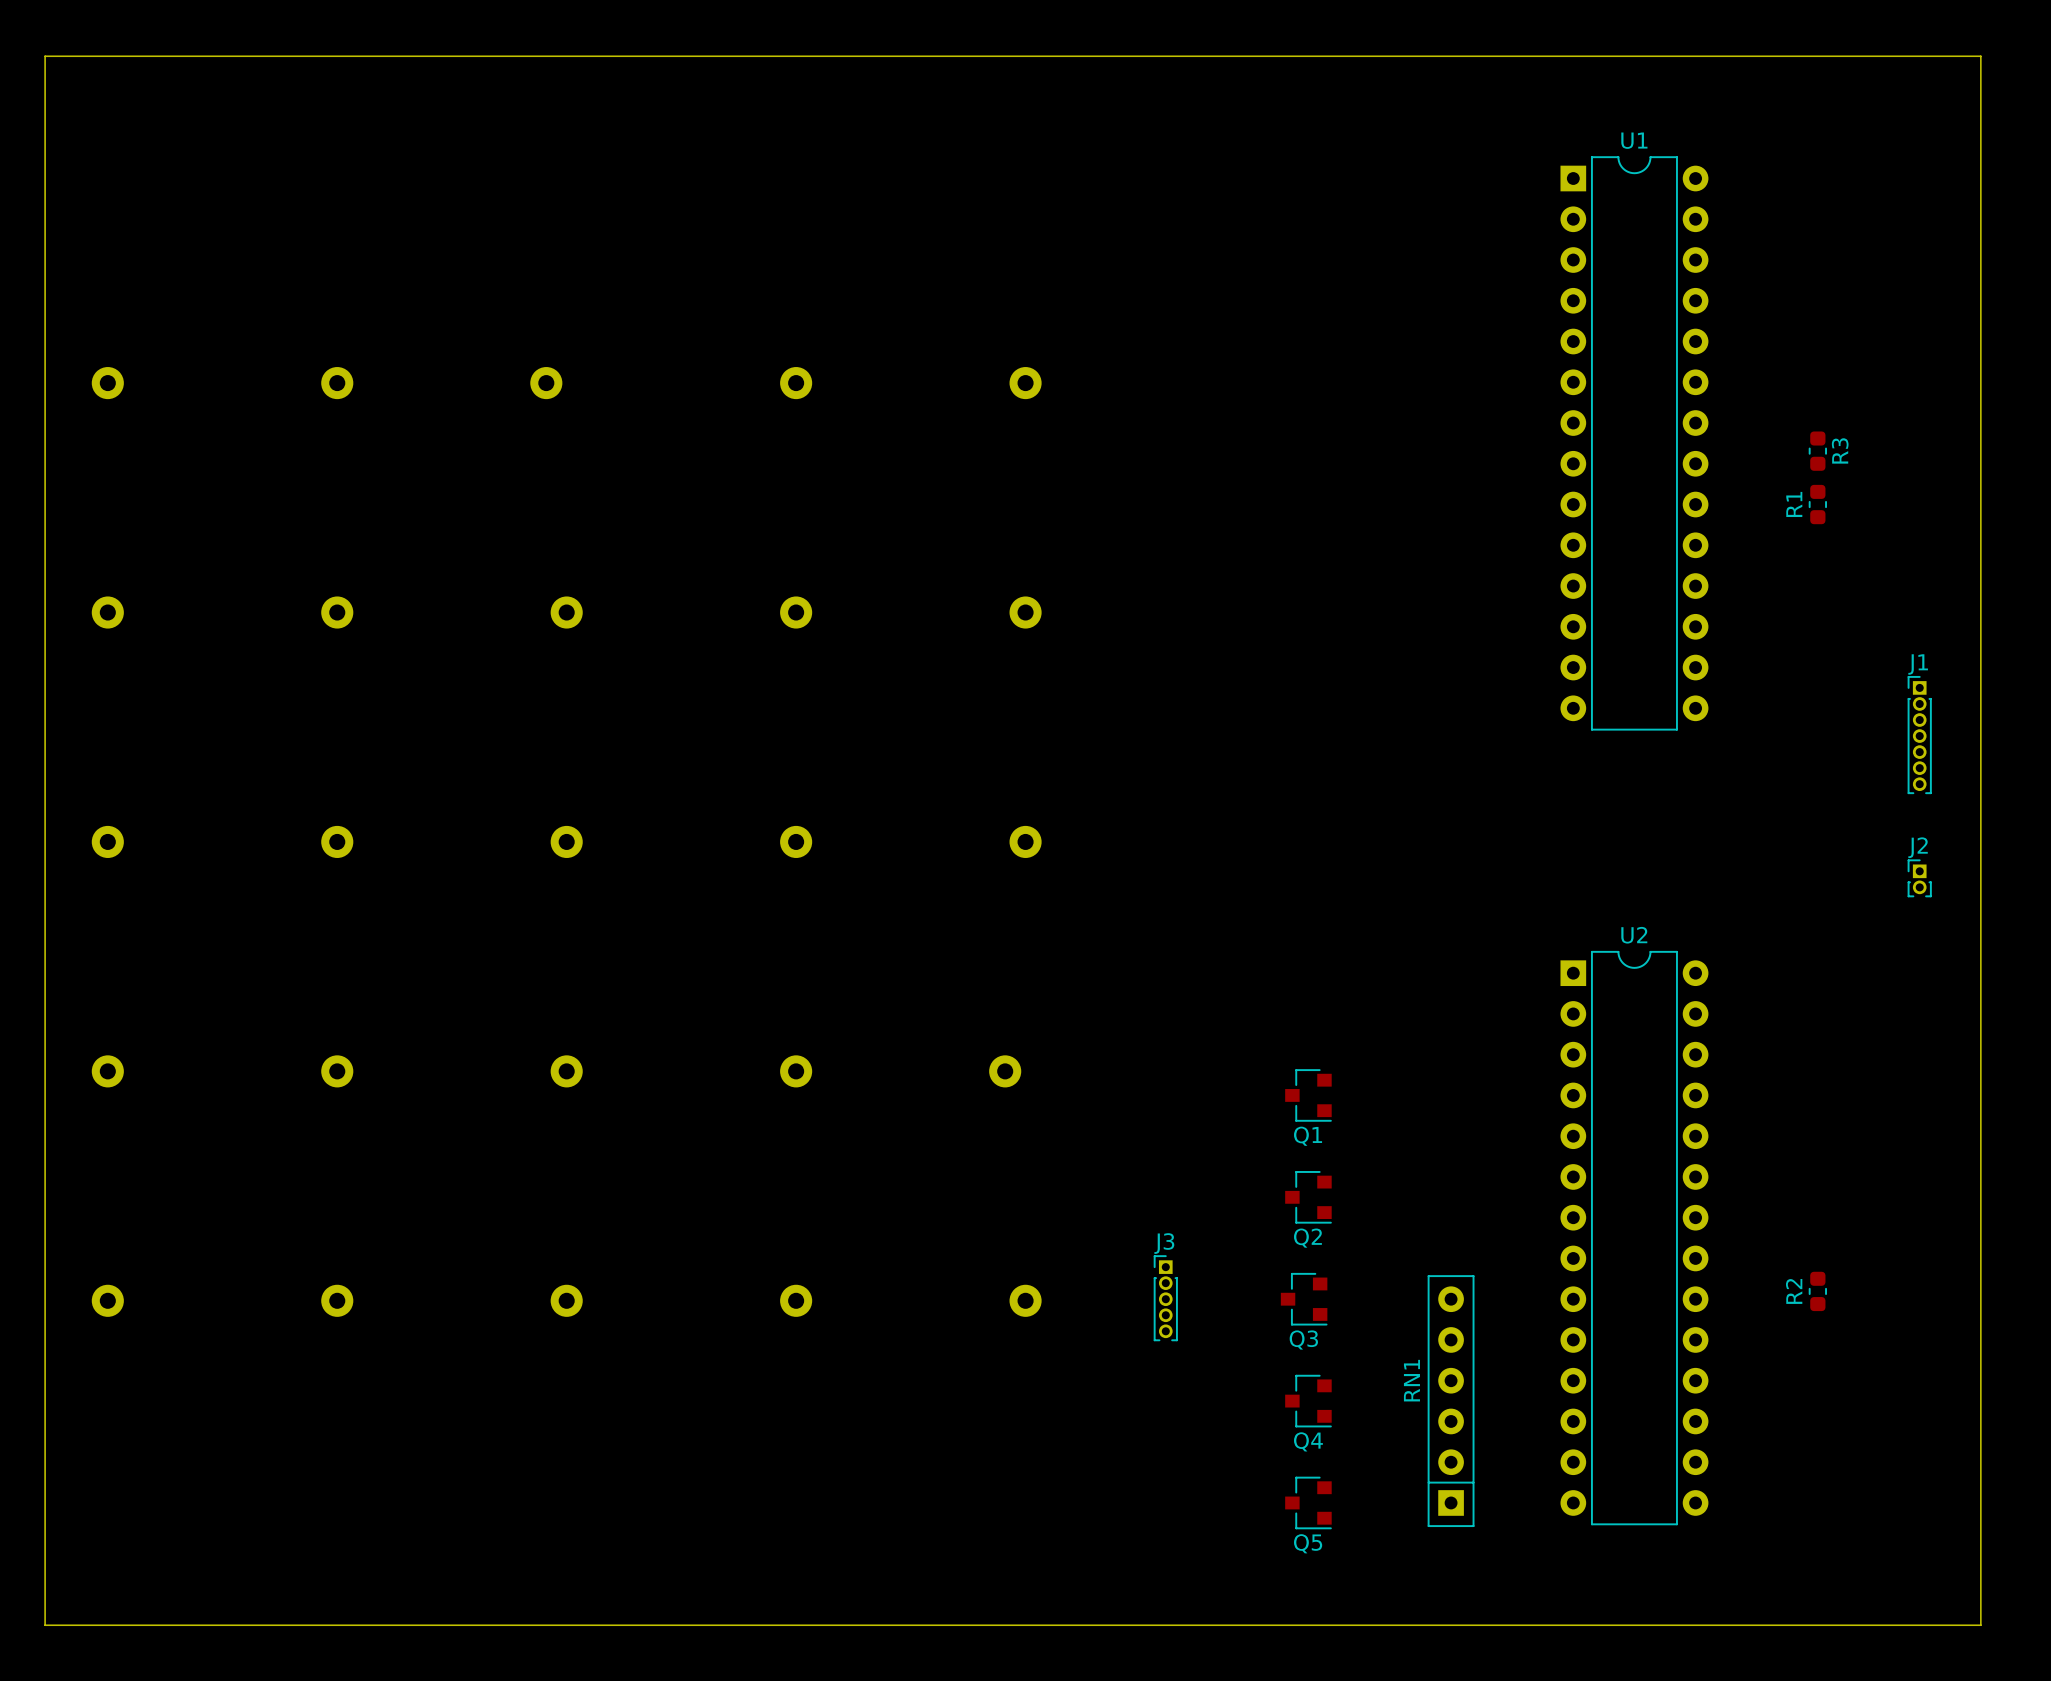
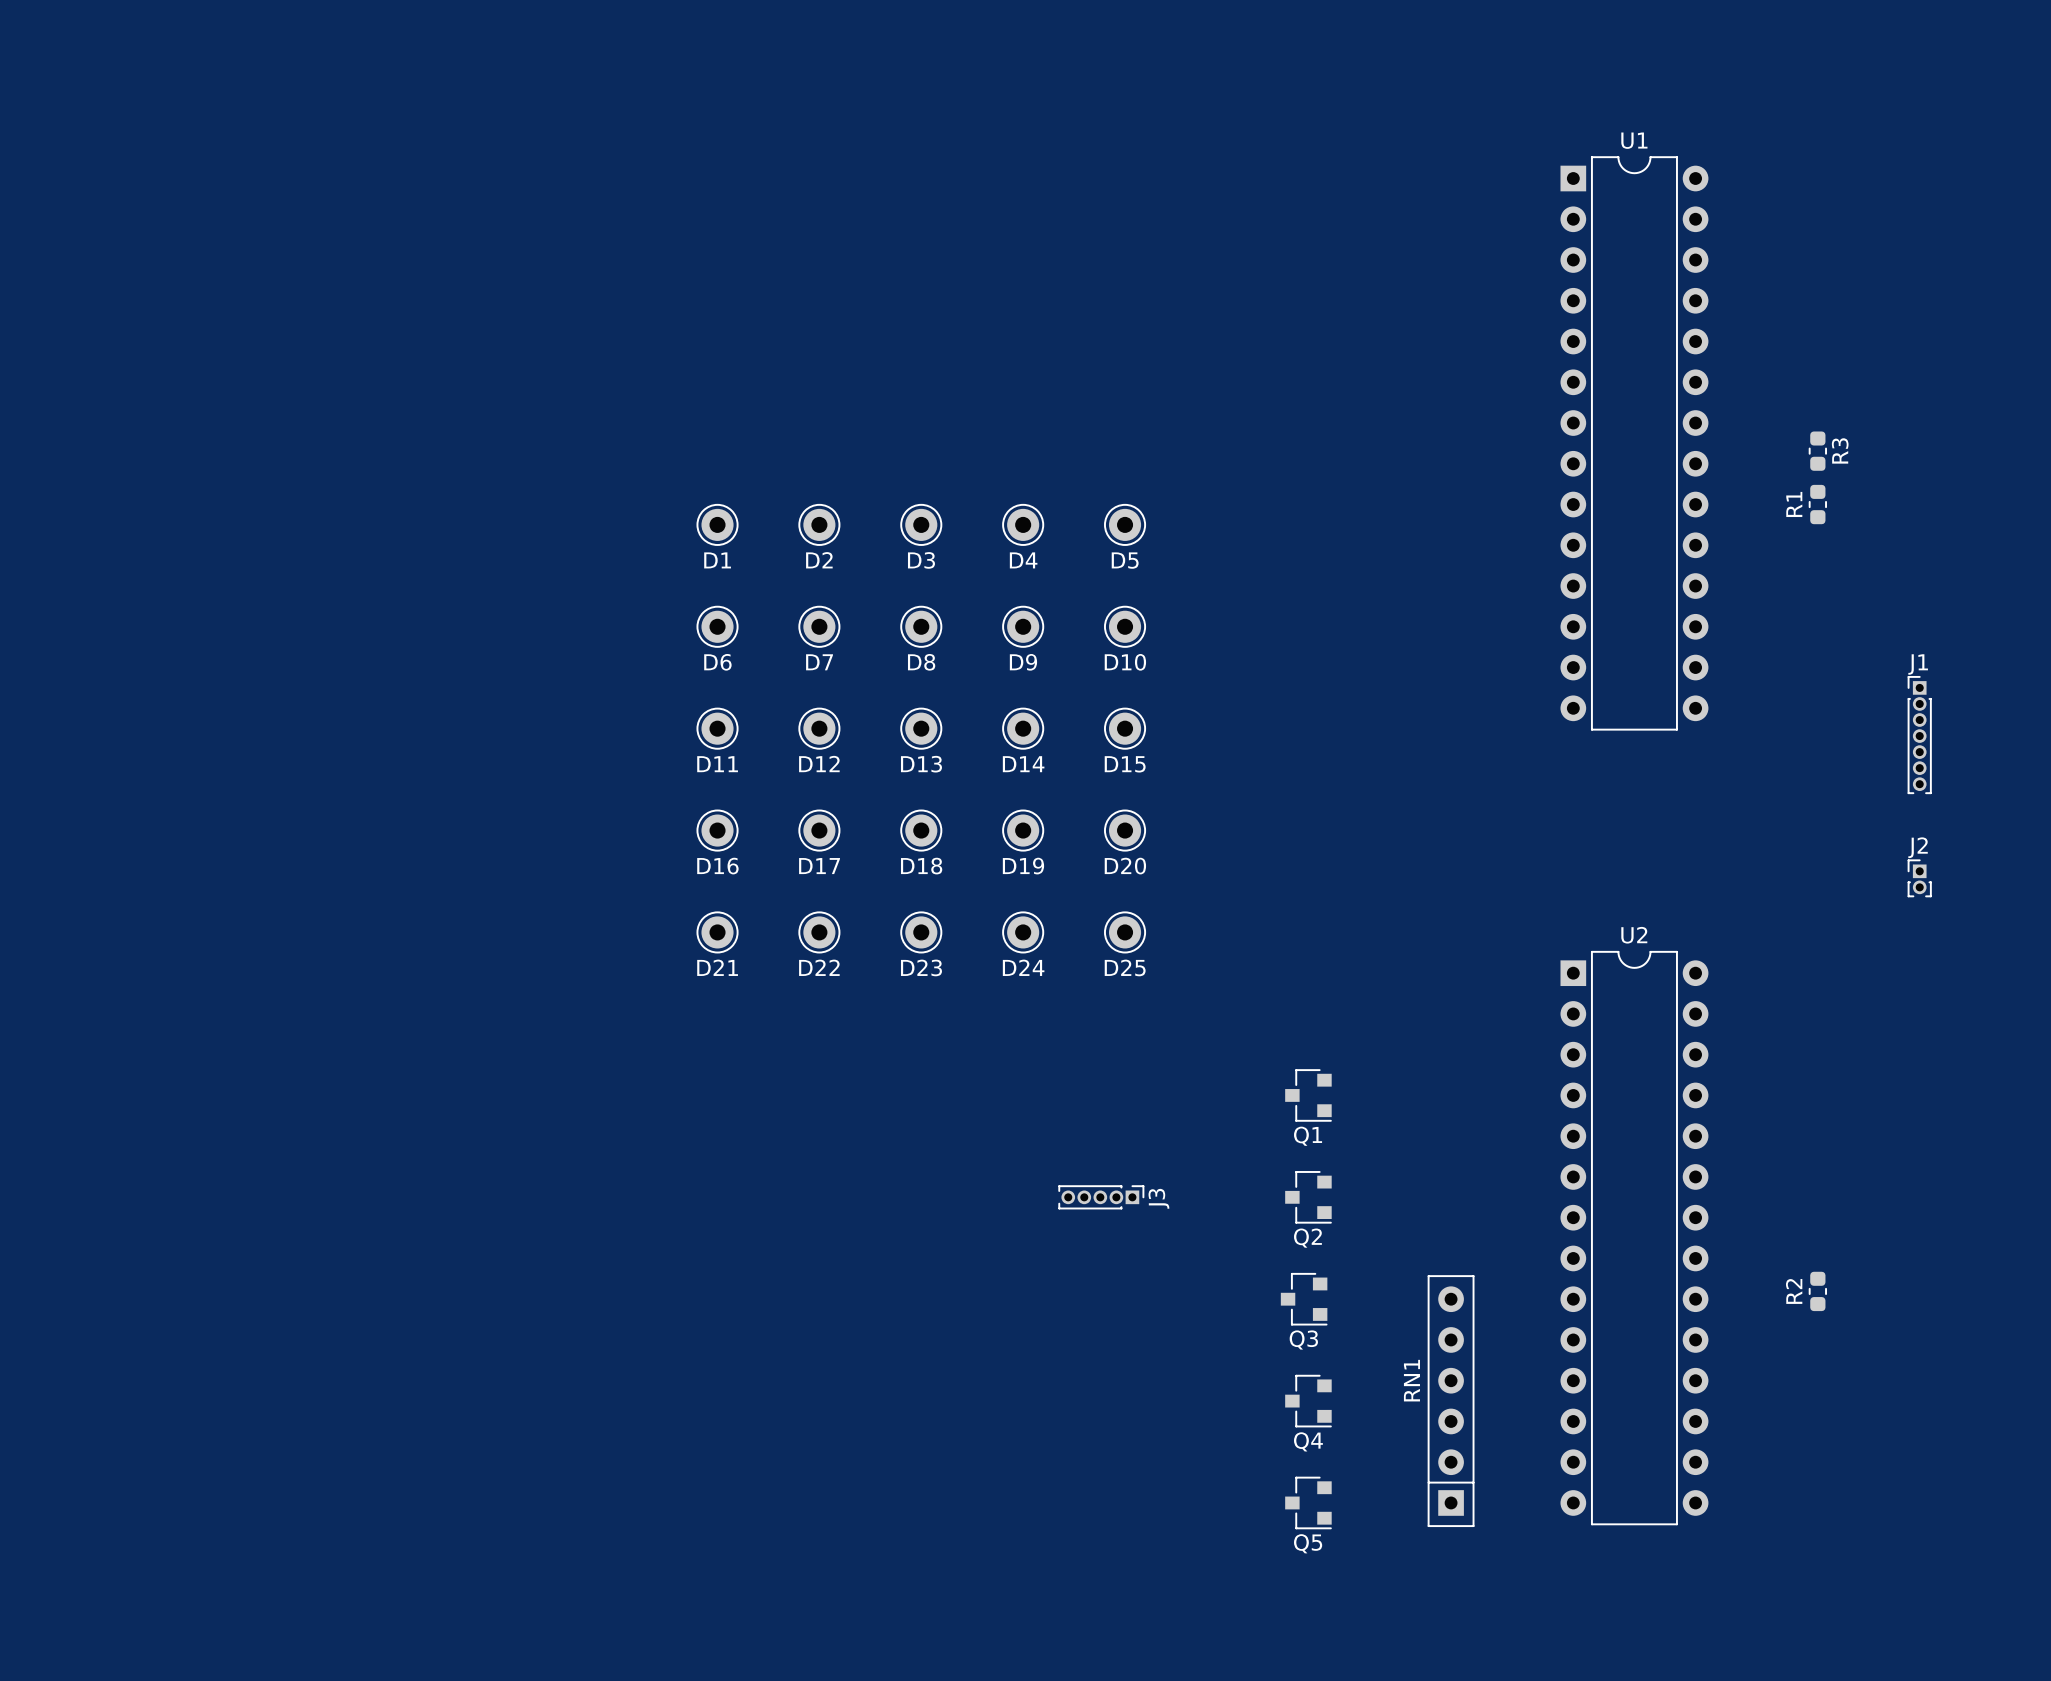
board edge: (45, 56) (1980, 56) (1980, 1625) (45, 1625) (45, 56) -> none
part: (107, 383) -> none
part: (337, 383) -> none
D3 side: bottom (546, 383) -> top (921, 524)
D4 side: bottom (796, 383) -> top (1023, 524)
D5 side: bottom (1025, 383) -> top (1125, 524)
D1: none -> (717, 524)
D2: none -> (819, 524)
part: (107, 612) -> none
part: (337, 612) -> none
D8 side: bottom (566, 612) -> top (921, 626)
D9 side: bottom (796, 612) -> top (1023, 626)
D10 side: bottom (1025, 612) -> top (1125, 626)
D6: none -> (717, 626)
D7: none -> (819, 626)
D11: none -> (717, 728)
D12: none -> (819, 728)
D16: none -> (717, 830)
D17: none -> (819, 830)
D18: none -> (921, 830)
part: (107, 841) -> none
part: (337, 841) -> none
D13 side: bottom (566, 841) -> top (921, 728)
D14 side: bottom (796, 841) -> top (1023, 728)
D15 side: bottom (1025, 841) -> top (1125, 728)
D21: none -> (717, 932)
D22: none -> (819, 932)
D23: none -> (921, 932)
D24: none -> (1023, 932)
part: (107, 1071) -> none
part: (337, 1071) -> none
part: (566, 1071) -> none
D19 side: bottom (796, 1071) -> top (1023, 830)
D20 side: bottom (1005, 1071) -> top (1125, 830)
J3 rotation: 0° (1165, 1298) -> 90° clockwise (1101, 1197)
J3 position: (1165, 1298) -> (1101, 1197)
part: (107, 1300) -> none
part: (337, 1300) -> none
part: (566, 1300) -> none
part: (796, 1300) -> none
D25 side: bottom (1025, 1300) -> top (1125, 932)

